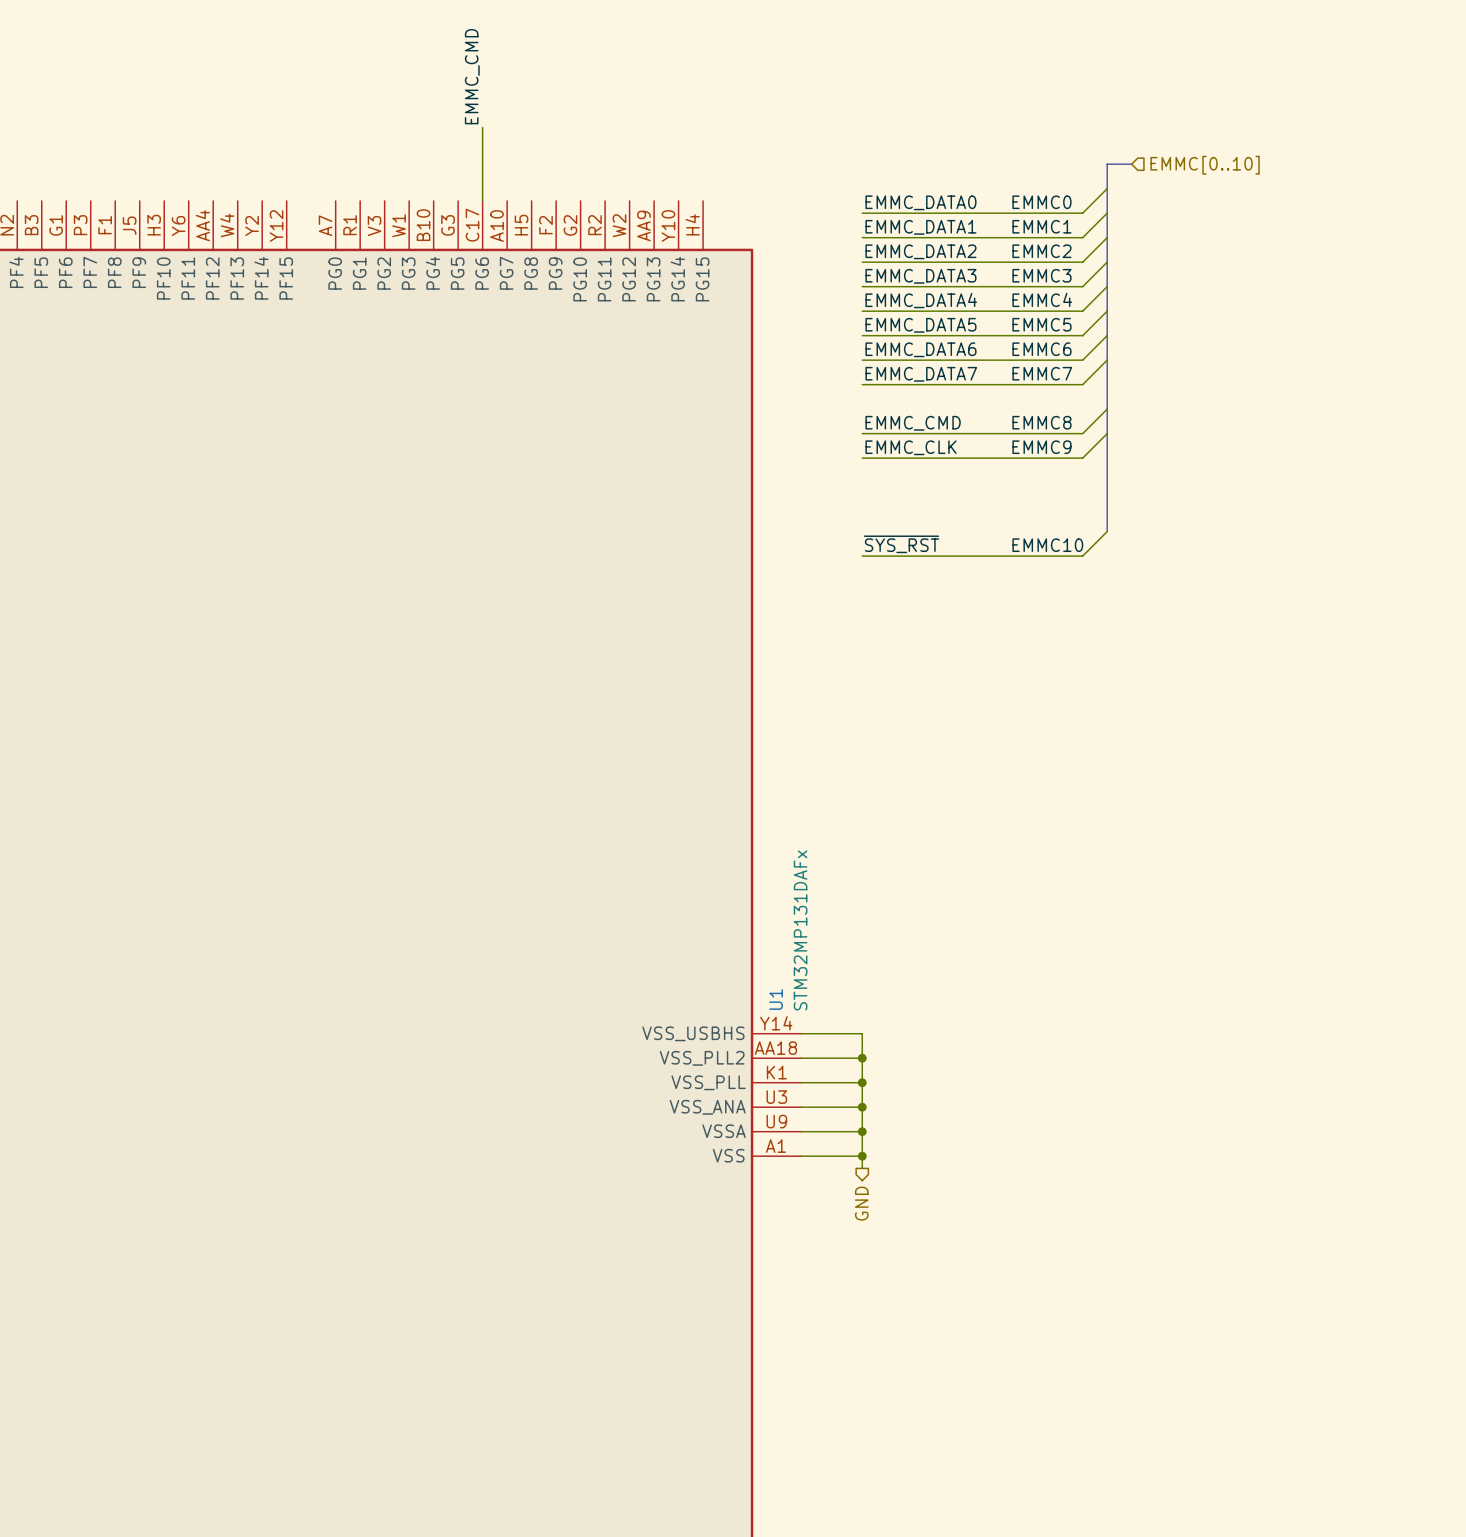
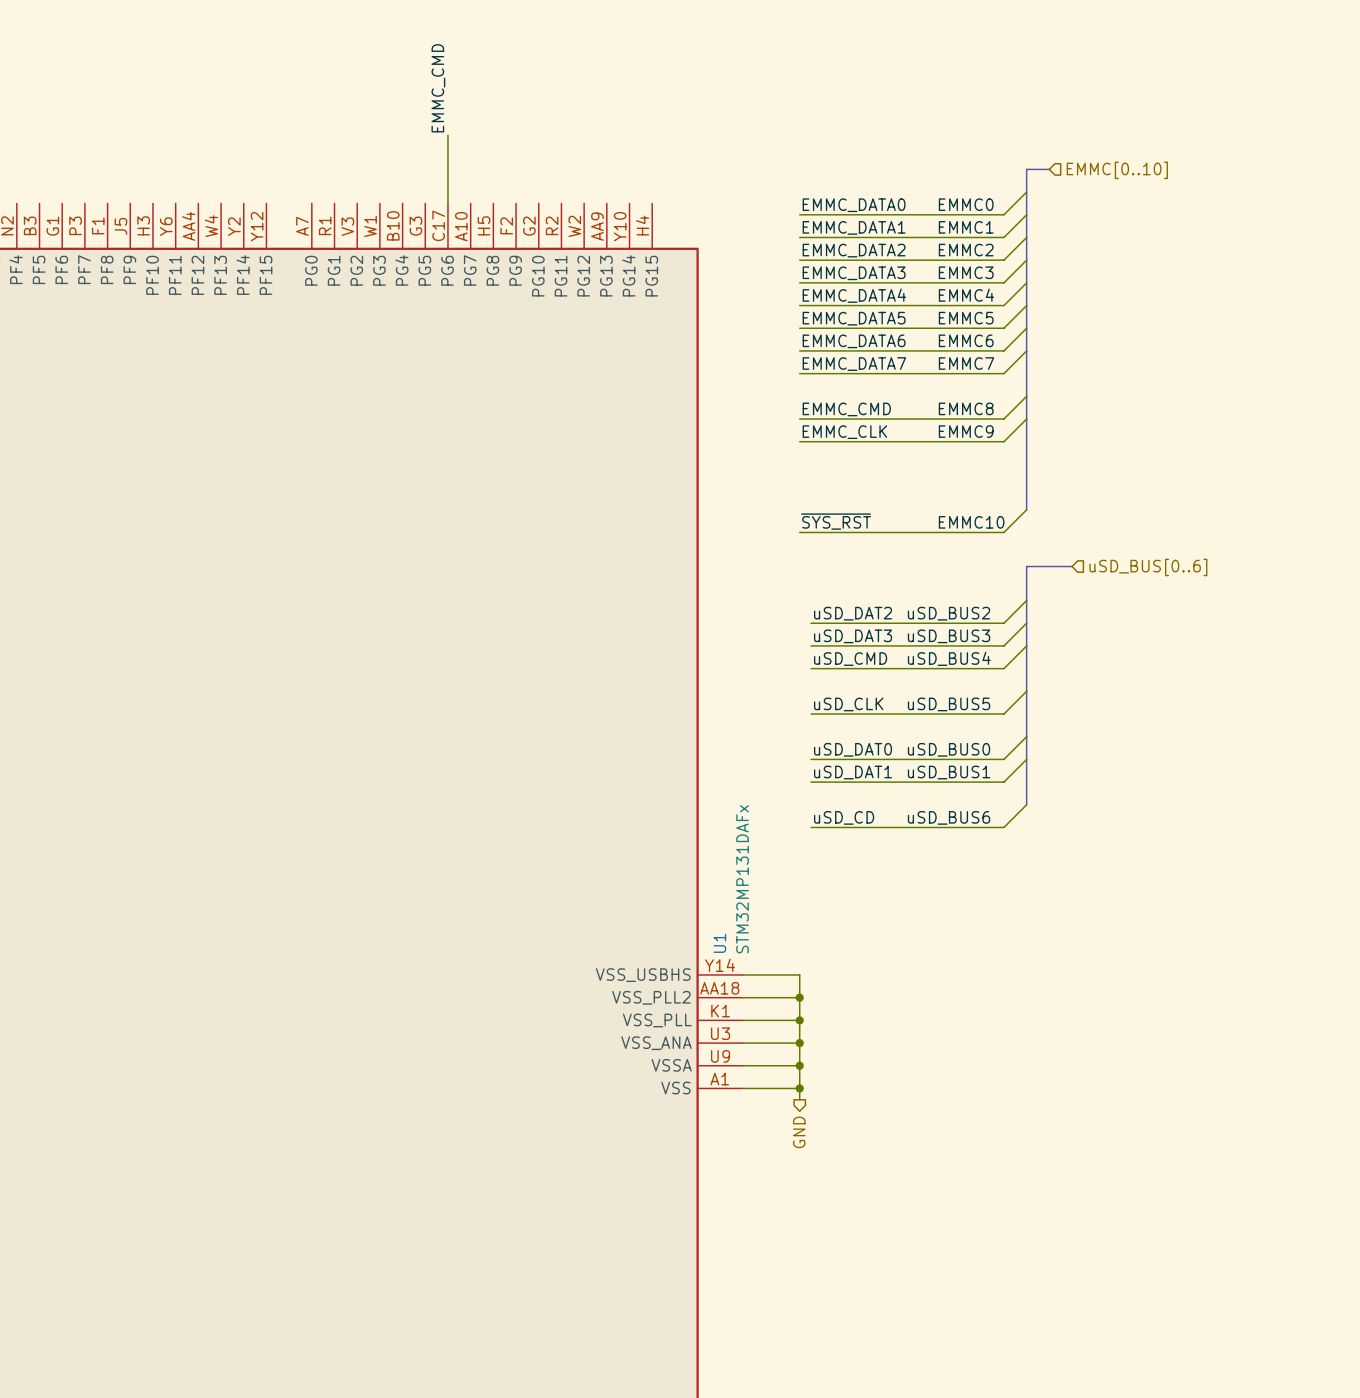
bus: none -> (1072, 566) (1026, 566) (1026, 804)
hierarchical label: none -> uSD_BUS[0..6] (1148, 567)
wire: none -> (1026, 600) (1003, 623) (811, 623)
label: none -> uSD_DAT2 (853, 613)
label: none -> uSD_BUS2 (949, 613)
wire: none -> (1026, 623) (1003, 645) (811, 645)
label: none -> uSD_DAT3 (853, 636)
label: none -> uSD_BUS3 (949, 636)
wire: none -> (1026, 645) (1003, 668) (811, 668)
label: none -> uSD_CMD (850, 659)
label: none -> uSD_BUS4 (949, 658)
wire: none -> (1026, 691) (1003, 714) (811, 714)
label: none -> uSD_CLK (848, 704)
label: none -> uSD_BUS5 (949, 704)
wire: none -> (1026, 736) (1003, 759) (811, 759)
label: none -> uSD_DAT0 (853, 749)
label: none -> uSD_BUS0 (949, 749)
wire: none -> (1026, 759) (1003, 782) (811, 782)
label: none -> uSD_DAT1 (853, 772)
label: none -> uSD_BUS1 (949, 772)
wire: none -> (1026, 804) (1003, 827) (811, 827)
label: none -> uSD_CD (844, 817)
label: none -> uSD_BUS6 (949, 817)

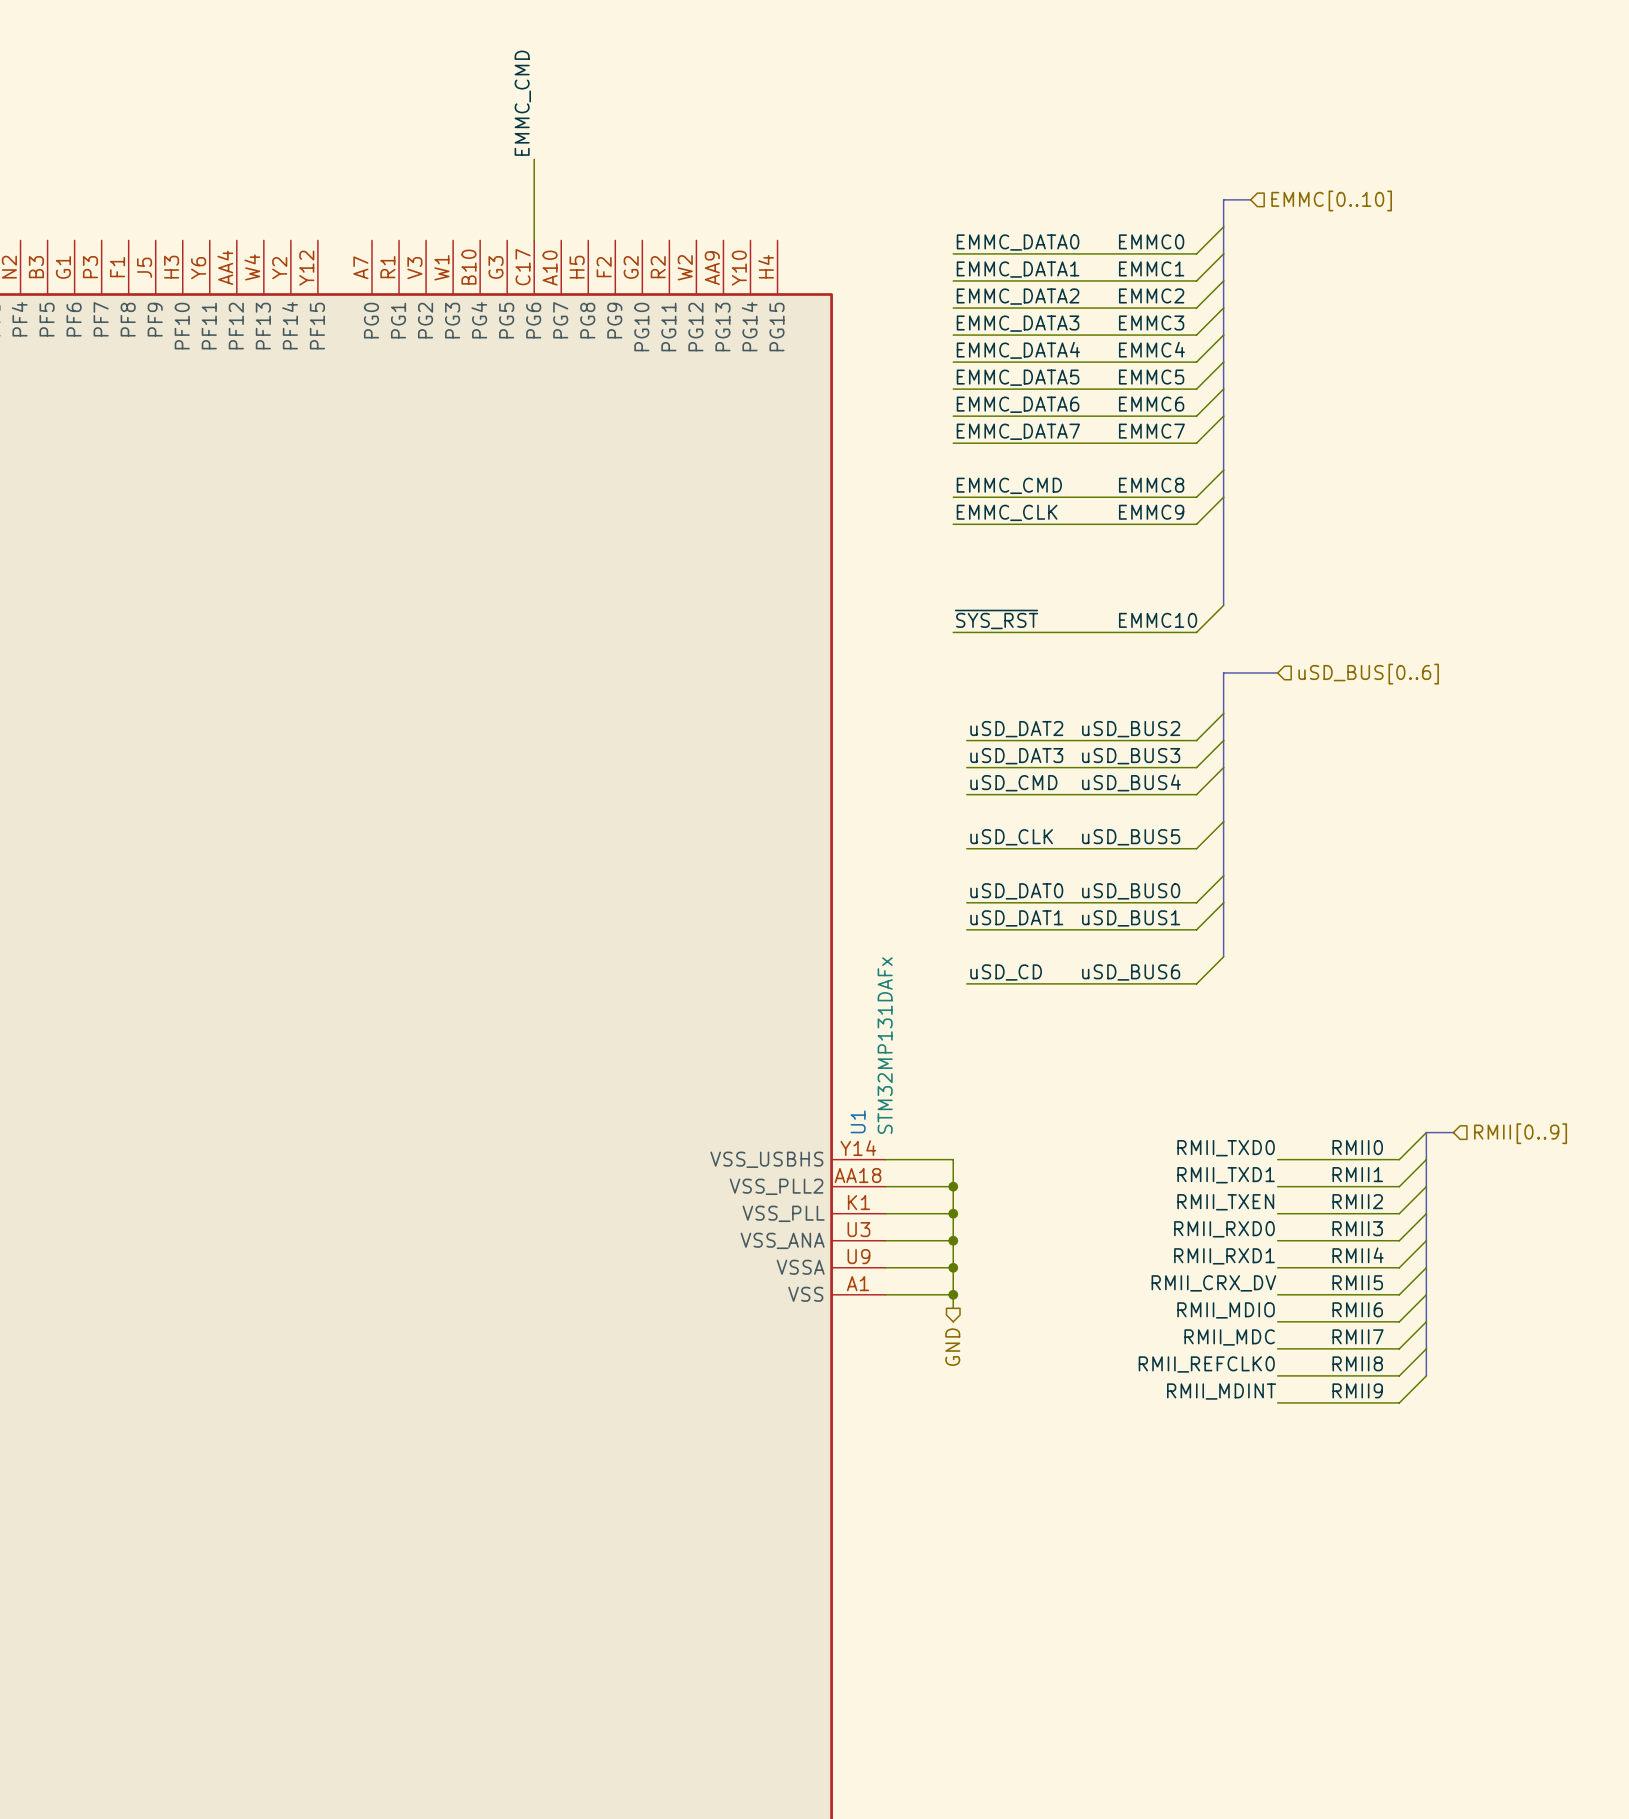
wire: none -> (1426, 1132) (1399, 1159) (1277, 1159)
bus: none -> (1453, 1132) (1426, 1132) (1426, 1375)
hierarchical label: none -> RMII[0..9] (1520, 1133)
label: none -> RMII0 (1357, 1147)
label: none -> RMII_TXD0 (1226, 1148)
wire: none -> (1426, 1159) (1399, 1186) (1277, 1186)
label: none -> RMII1 (1357, 1174)
label: none -> RMII_TXD1 (1226, 1175)
wire: none -> (1426, 1186) (1399, 1213) (1277, 1213)
label: none -> RMII_TXEN (1225, 1202)
label: none -> RMII2 (1357, 1201)
wire: none -> (1426, 1213) (1399, 1240) (1277, 1240)
label: none -> RMII3 (1357, 1228)
label: none -> RMII_RXD0 (1224, 1229)
wire: none -> (1426, 1240) (1399, 1267) (1277, 1267)
label: none -> RMII4 (1358, 1255)
label: none -> RMII_RXD1 (1224, 1256)
wire: none -> (1426, 1267) (1399, 1294) (1277, 1294)
label: none -> RMII_CRX_DV (1213, 1283)
label: none -> RMII5 (1357, 1282)
wire: none -> (1426, 1294) (1399, 1321) (1277, 1321)
label: none -> RMII_MDIO (1226, 1310)
label: none -> RMII6 (1357, 1309)
wire: none -> (1426, 1321) (1399, 1348) (1277, 1348)
label: none -> RMII7 (1358, 1336)
label: none -> RMII_MDC (1229, 1337)
wire: none -> (1426, 1348) (1399, 1375) (1277, 1375)
label: none -> RMII_REFCLK0 (1206, 1364)
label: none -> RMII8 (1357, 1363)
wire: none -> (1426, 1375) (1399, 1402) (1277, 1402)
label: none -> RMII_MDINT (1221, 1391)
label: none -> RMII9 (1357, 1390)

